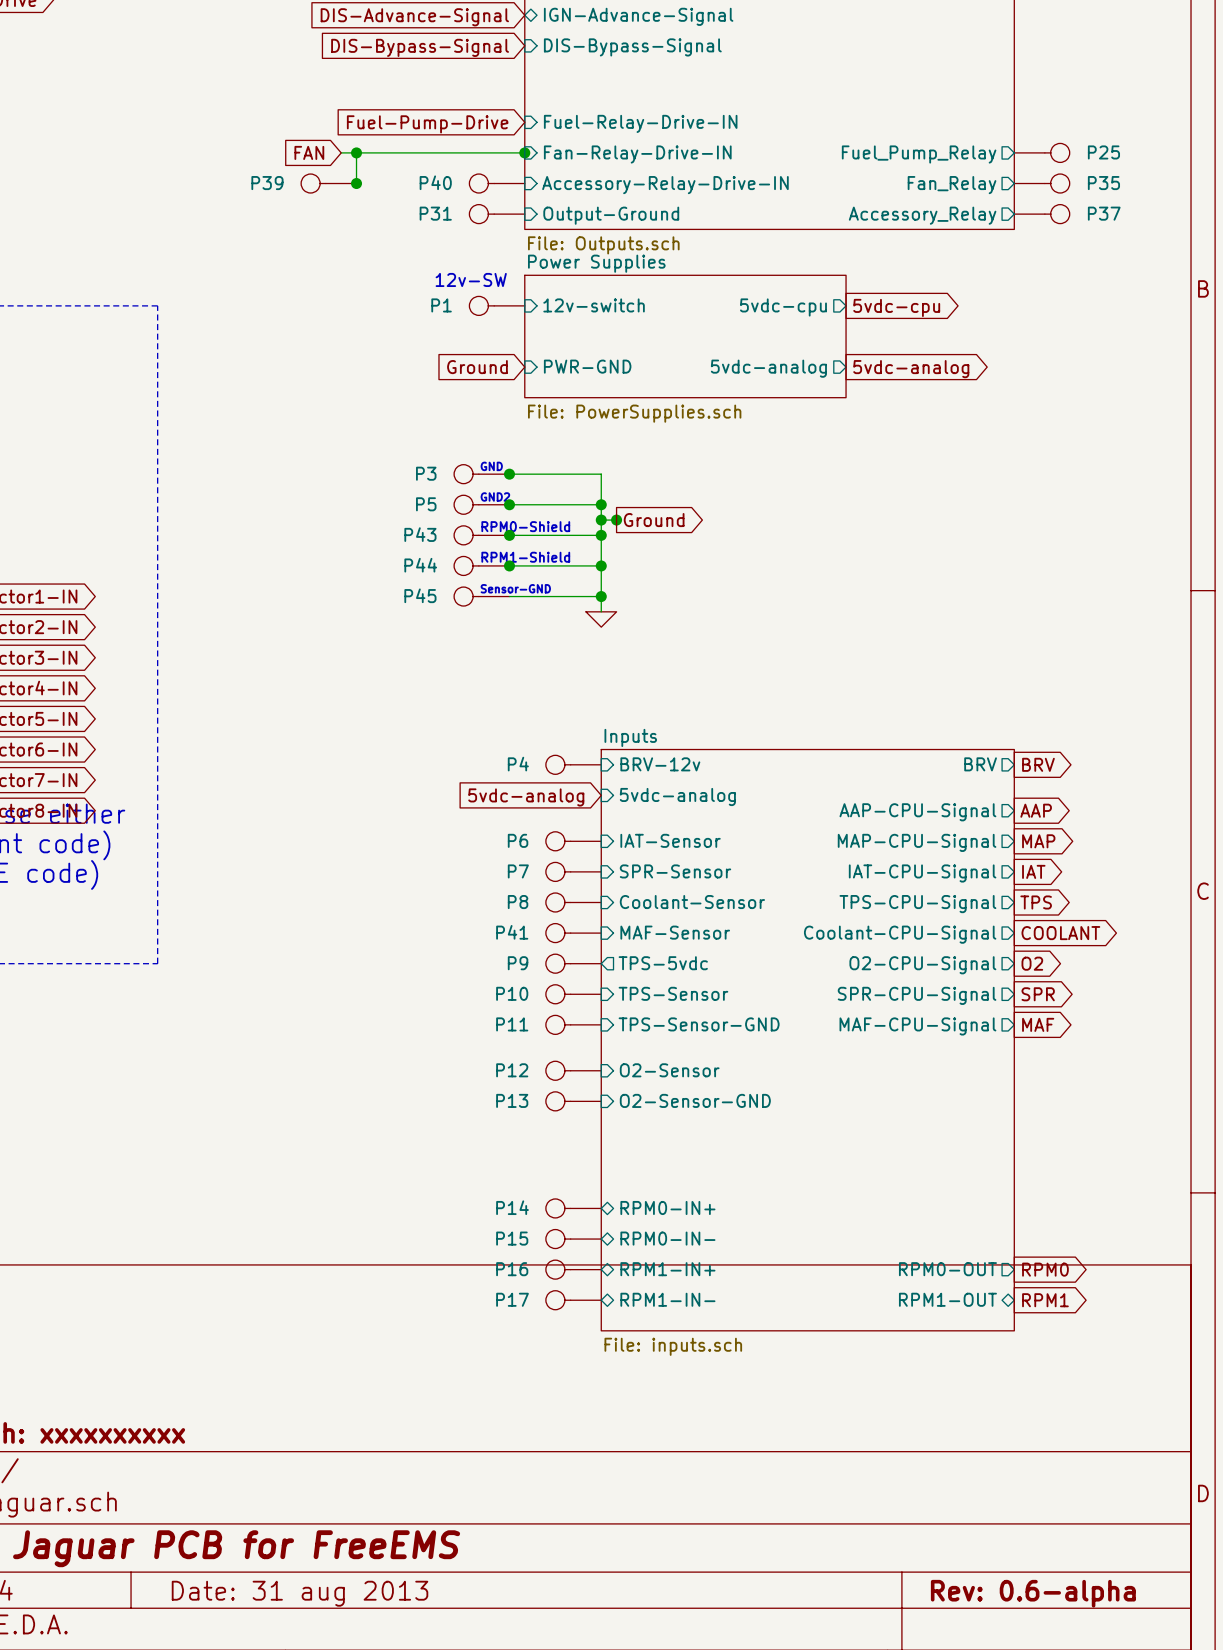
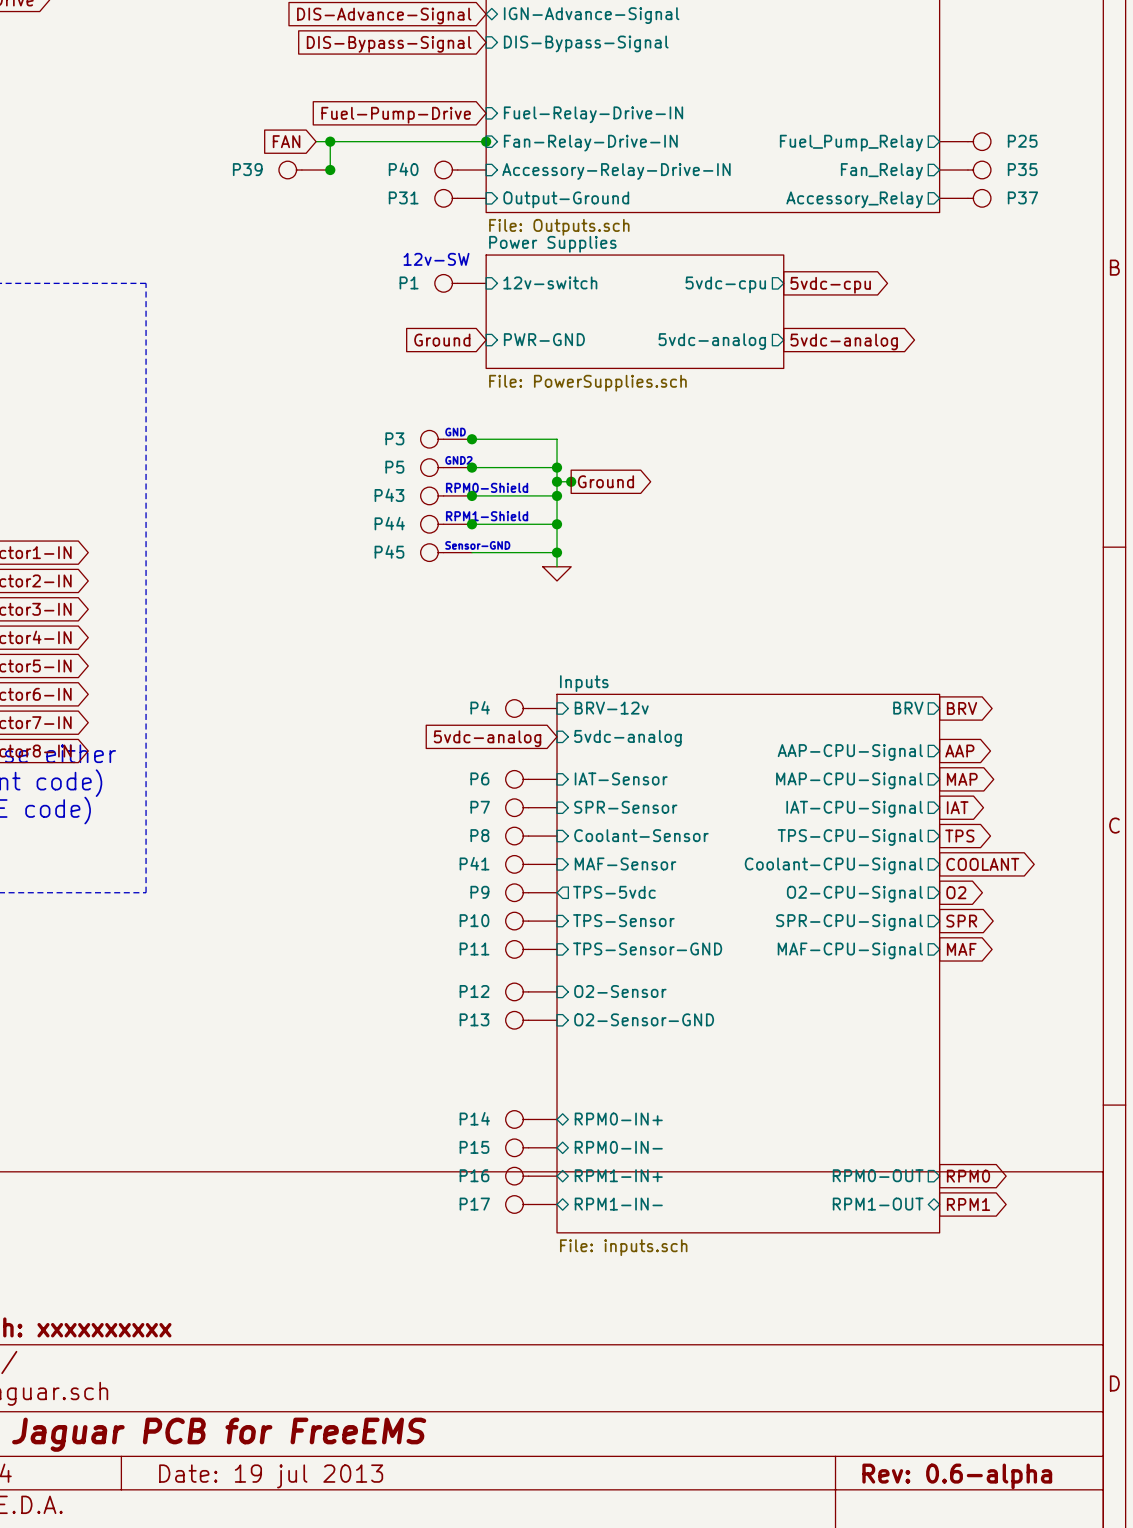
title block: Date: 31 aug 2013 (300, 1593) -> Date: 19 jul 2013 (271, 1476)

